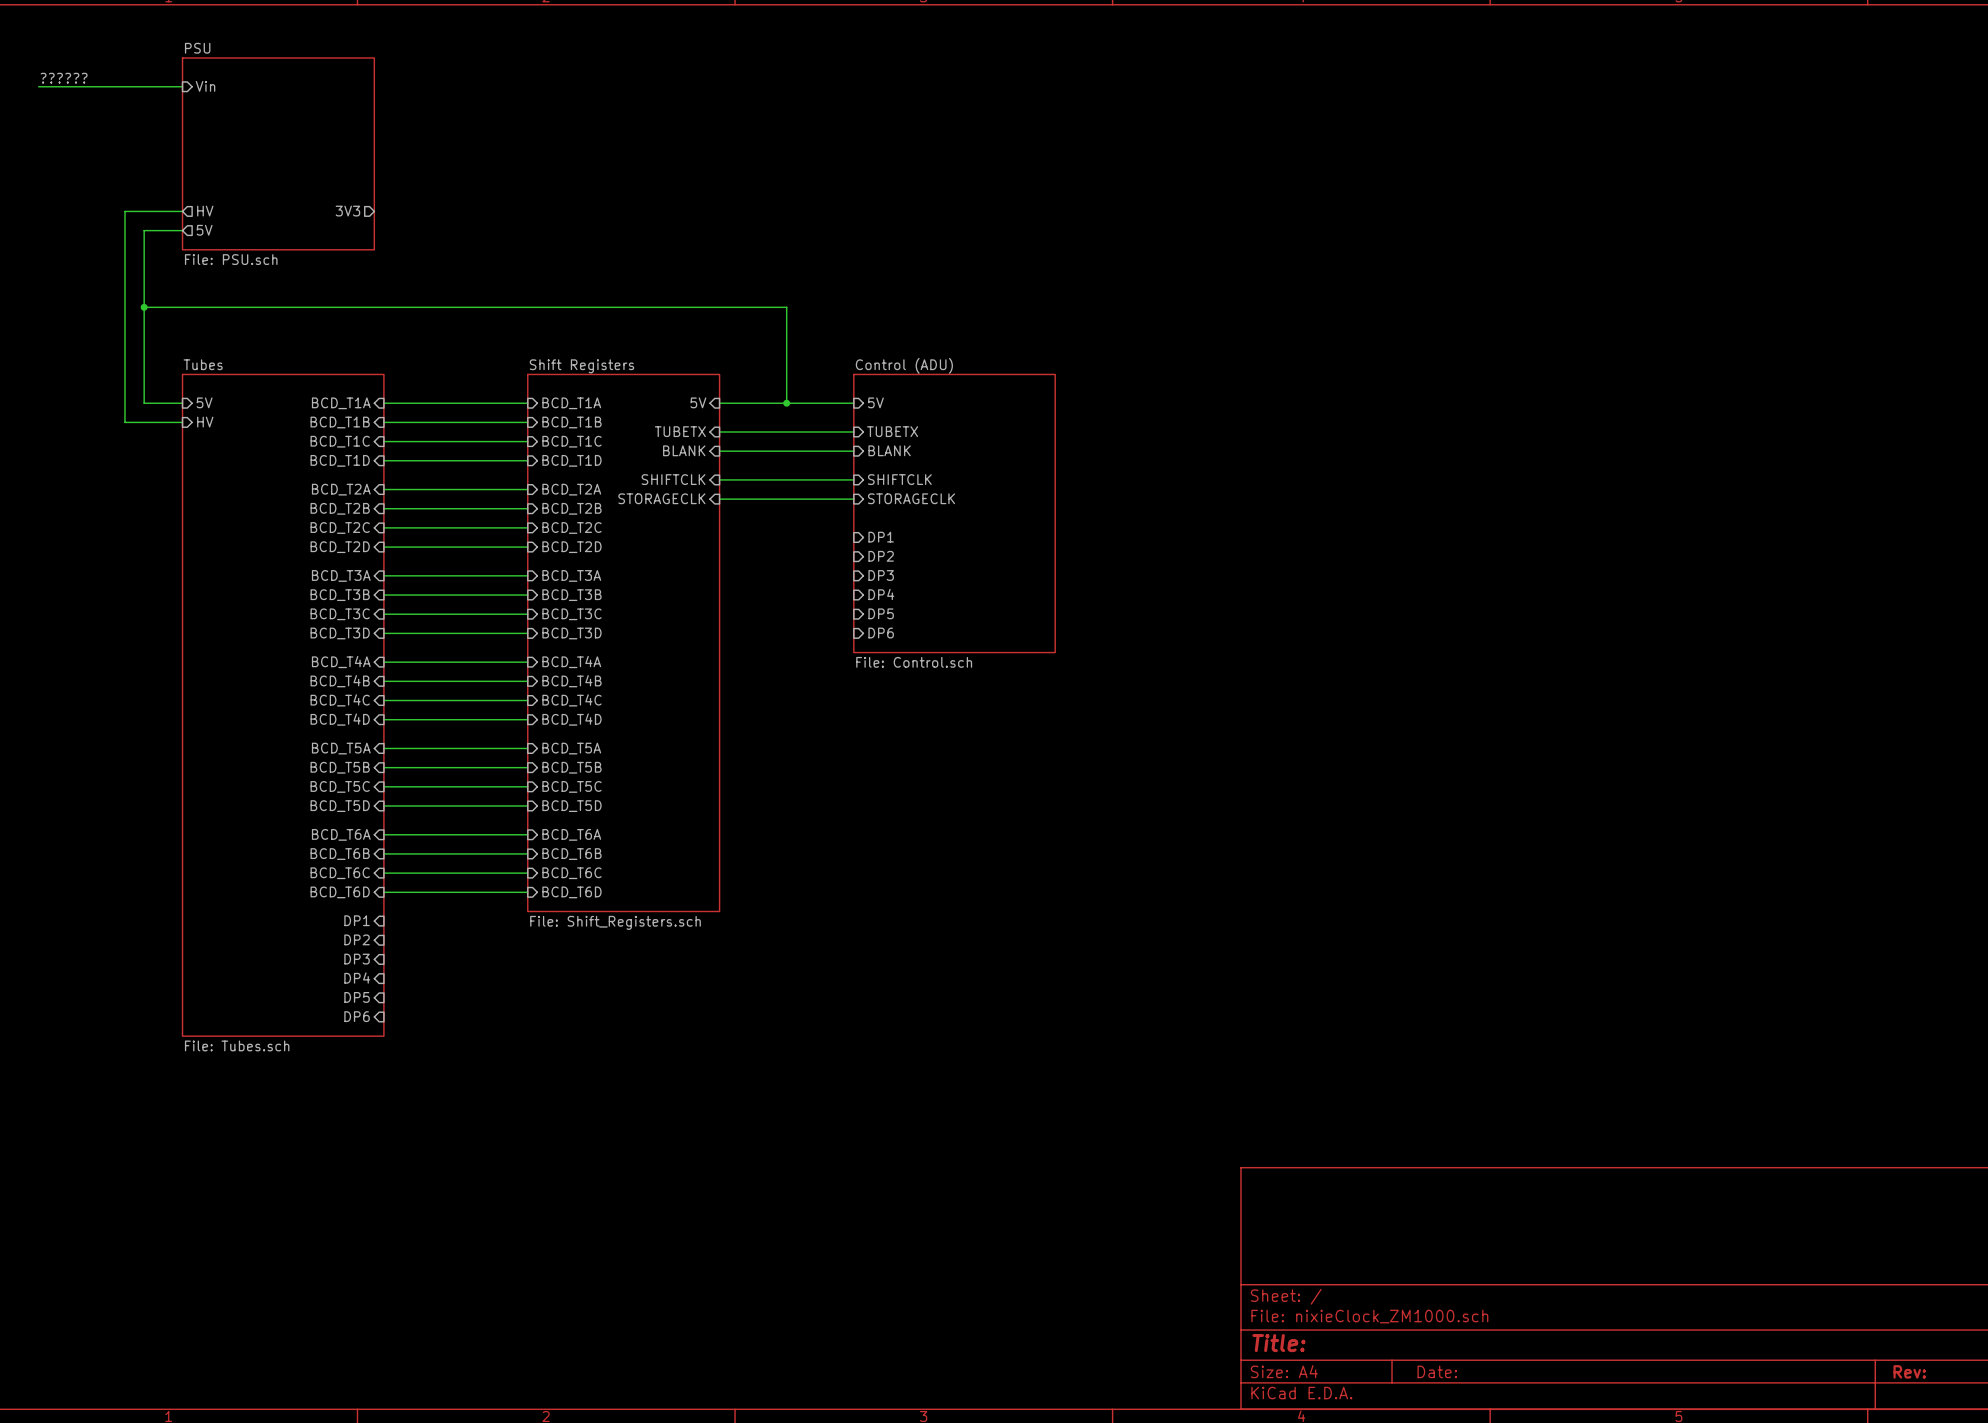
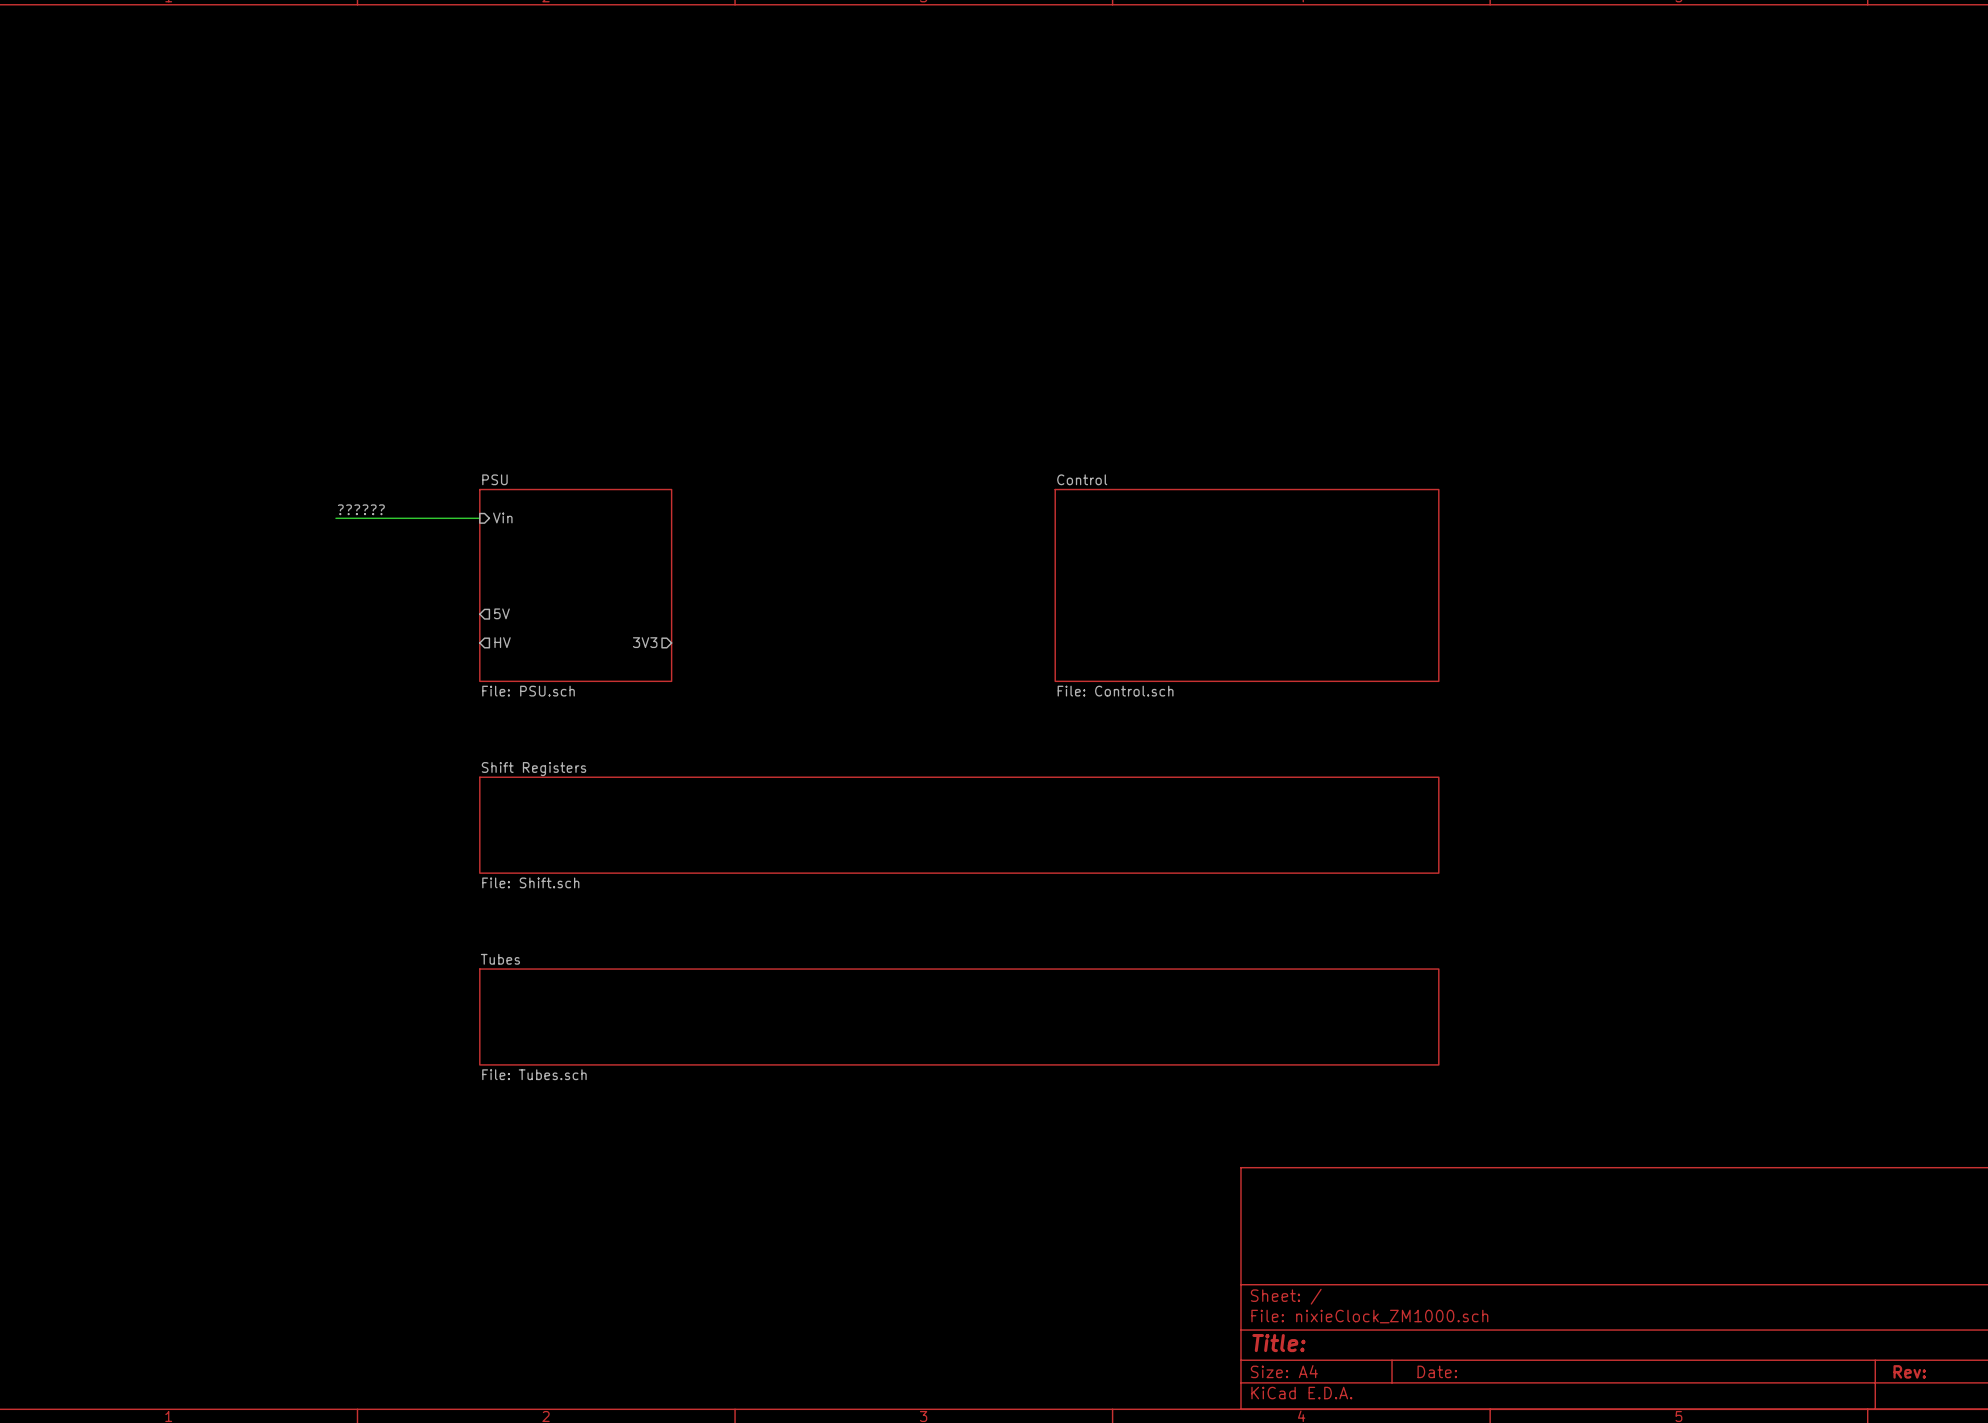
label: ?????? (64, 78) -> none
wire: (38, 86) (182, 86) -> none
sheet pin: Vin (205, 86) -> none
sheet PSU: File: PSU.sch (278, 153) -> none
wire: (182, 211) (124, 211) (124, 422) (182, 422) -> none
sheet pin: HV (205, 211) -> none
sheet pin: 3V3 (347, 211) -> none
wire: (182, 230) (144, 230) (144, 403) (182, 403) -> none
sheet pin: 5V (204, 230) -> none
wire: (144, 307) (786, 307) (786, 403) -> none
junction: (144, 307) -> none
sheet pin: 5V (204, 402) -> none
sheet pin: 5V (698, 402) -> none
sheet pin: 5V (875, 402) -> none
sheet pin: BCD_T1A (341, 403) -> none
wire: (383, 403) (527, 403) -> none
sheet pin: BCD_T1A (571, 403) -> none
wire: (719, 403) (853, 403) -> none
junction: (786, 403) -> none
sheet pin: HV (205, 422) -> none
sheet pin: BCD_T1B (340, 422) -> none
wire: (383, 422) (527, 422) -> none
sheet pin: BCD_T1B (571, 422) -> none
sheet pin: TUBETX (680, 431) -> none
sheet pin: TUBETX (892, 431) -> none
wire: (719, 432) (853, 432) -> none
sheet pin: BCD_T1C (340, 441) -> none
wire: (383, 441) (527, 441) -> none
sheet pin: BCD_T1C (571, 441) -> none
sheet pin: BLANK (684, 450) -> none
sheet pin: BLANK (889, 450) -> none
wire: (719, 451) (853, 451) -> none
sheet pin: BCD_T1D (340, 460) -> none
wire: (383, 460) (527, 460) -> none
sheet pin: BCD_T1D (571, 460) -> none
sheet pin: SHIFTCLK (673, 479) -> none
wire: (719, 479) (853, 479) -> none
sheet pin: SHIFTCLK (899, 479) -> none
sheet pin: BCD_T2A (341, 489) -> none
wire: (383, 489) (527, 489) -> none
sheet pin: BCD_T2A (571, 489) -> none
sheet pin: STORAGECLK (661, 498) -> none
sheet pin: STORAGECLK (911, 498) -> none
wire: (719, 499) (853, 499) -> none
sheet pin: BCD_T2B (340, 508) -> none
wire: (383, 508) (527, 508) -> none
sheet pin: BCD_T2B (571, 508) -> none
label: none -> ?????? (361, 509)
sheet Control (ADU): File: Control.sch (954, 513) -> none
sheet pin: none -> Vin (502, 517)
sheet pin: BCD_T2C (340, 527) -> none
wire: (383, 527) (527, 527) -> (335, 518) (479, 518)
sheet pin: BCD_T2C (571, 527) -> none
sheet pin: DP1 (881, 537) -> none
sheet pin: BCD_T2D (340, 547) -> none
wire: (383, 547) (527, 547) -> none
sheet pin: BCD_T2D (571, 547) -> none
sheet pin: DP2 (881, 556) -> none
sheet pin: BCD_T3A (341, 575) -> none
wire: (383, 575) (527, 575) -> none
sheet pin: BCD_T3A (571, 575) -> none
sheet pin: DP3 (881, 575) -> none
sheet PSU: none -> File: PSU.sch (575, 585)
sheet Control: none -> File: Control.sch (1247, 585)
sheet pin: DP4 (881, 594) -> none
sheet pin: BCD_T3B (340, 595) -> none
wire: (383, 595) (527, 595) -> none
sheet pin: BCD_T3B (571, 595) -> none
sheet pin: none -> 5V (501, 613)
sheet pin: DP5 (881, 613) -> none
sheet pin: BCD_T3C (340, 614) -> none
wire: (383, 614) (527, 614) -> none
sheet pin: BCD_T3C (571, 614) -> none
sheet pin: BCD_T3D (340, 633) -> none
wire: (383, 633) (527, 633) -> none
sheet pin: BCD_T3D (571, 633) -> none
sheet pin: DP6 (881, 633) -> none
sheet pin: none -> HV (502, 642)
sheet Shift Registers: File: Shift_Registers.sch (623, 642) -> none
sheet pin: none -> 3V3 (645, 642)
sheet pin: BCD_T4A (341, 662) -> none
wire: (383, 662) (527, 662) -> none
sheet pin: BCD_T4A (571, 662) -> none
sheet pin: BCD_T4B (340, 681) -> none
wire: (383, 681) (527, 681) -> none
sheet pin: BCD_T4B (571, 681) -> none
sheet pin: BCD_T4C (340, 700) -> none
wire: (383, 700) (527, 700) -> none
sheet pin: BCD_T4C (571, 700) -> none
sheet Tubes: File: Tubes.sch (283, 705) -> none
sheet pin: BCD_T4D (340, 719) -> none
wire: (383, 719) (527, 719) -> none
sheet pin: BCD_T4D (571, 719) -> none
sheet pin: BCD_T5A (341, 748) -> none
wire: (383, 748) (527, 748) -> none
sheet pin: BCD_T5A (571, 748) -> none
sheet pin: BCD_T5B (340, 767) -> none
wire: (383, 767) (527, 767) -> none
sheet pin: BCD_T5B (571, 767) -> none
sheet pin: BCD_T5C (340, 786) -> none
wire: (383, 786) (527, 786) -> none
sheet pin: BCD_T5C (571, 786) -> none
sheet pin: BCD_T5D (340, 806) -> none
wire: (383, 806) (527, 806) -> none
sheet pin: BCD_T5D (571, 806) -> none
sheet Shift Registers: none -> File: Shift.sch (959, 825)
sheet pin: BCD_T6A (341, 834) -> none
wire: (383, 834) (527, 834) -> none
sheet pin: BCD_T6A (571, 834) -> none
wire: (383, 853) (527, 853) -> none
sheet pin: BCD_T6B (340, 854) -> none
sheet pin: BCD_T6B (571, 854) -> none
sheet pin: BCD_T6C (340, 873) -> none
wire: (383, 873) (527, 873) -> none
sheet pin: BCD_T6C (571, 873) -> none
sheet pin: BCD_T6D (340, 892) -> none
wire: (383, 892) (527, 892) -> none
sheet pin: BCD_T6D (571, 892) -> none
sheet pin: DP1 (357, 920) -> none
sheet pin: DP2 (357, 939) -> none
sheet pin: DP3 (357, 959) -> none
sheet pin: DP4 (357, 978) -> none
sheet pin: DP5 (357, 997) -> none
sheet pin: DP6 (357, 1016) -> none
sheet Tubes: none -> File: Tubes.sch (959, 1016)

